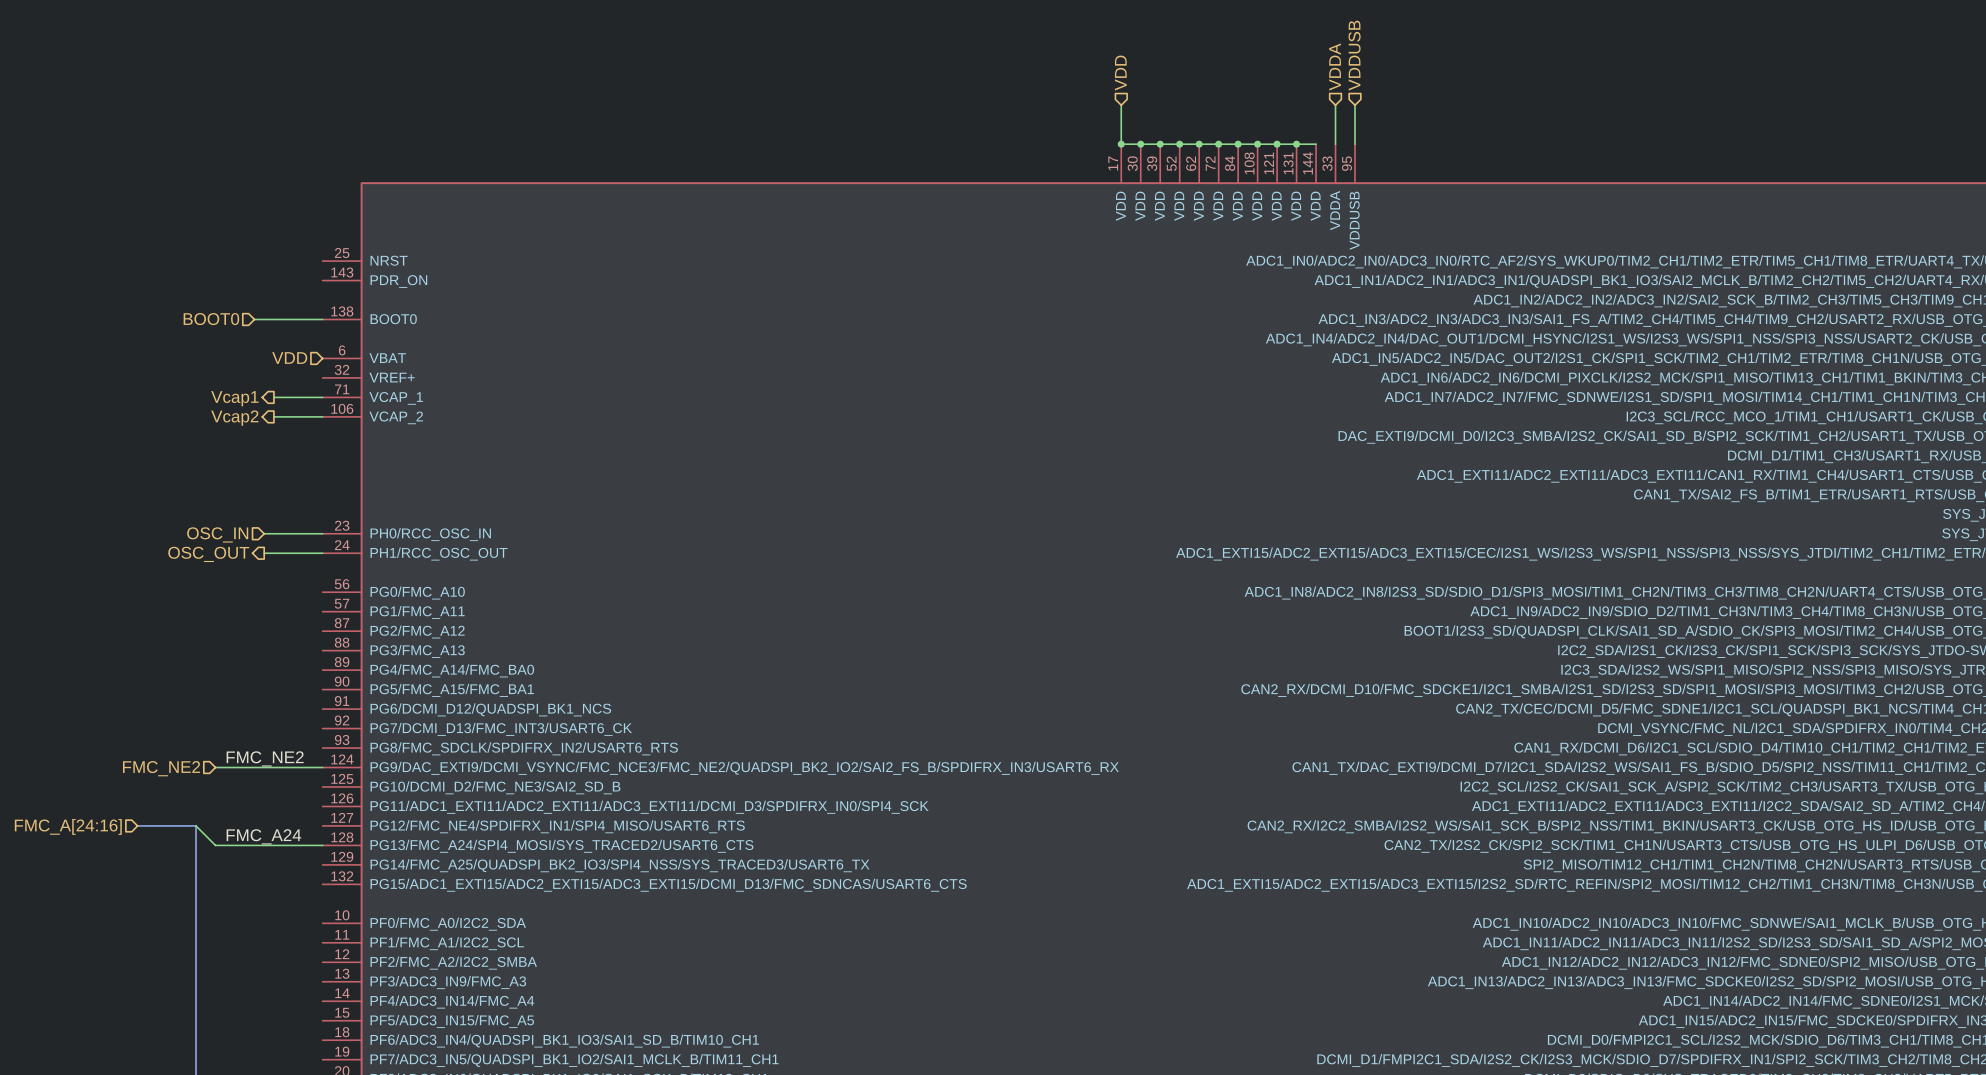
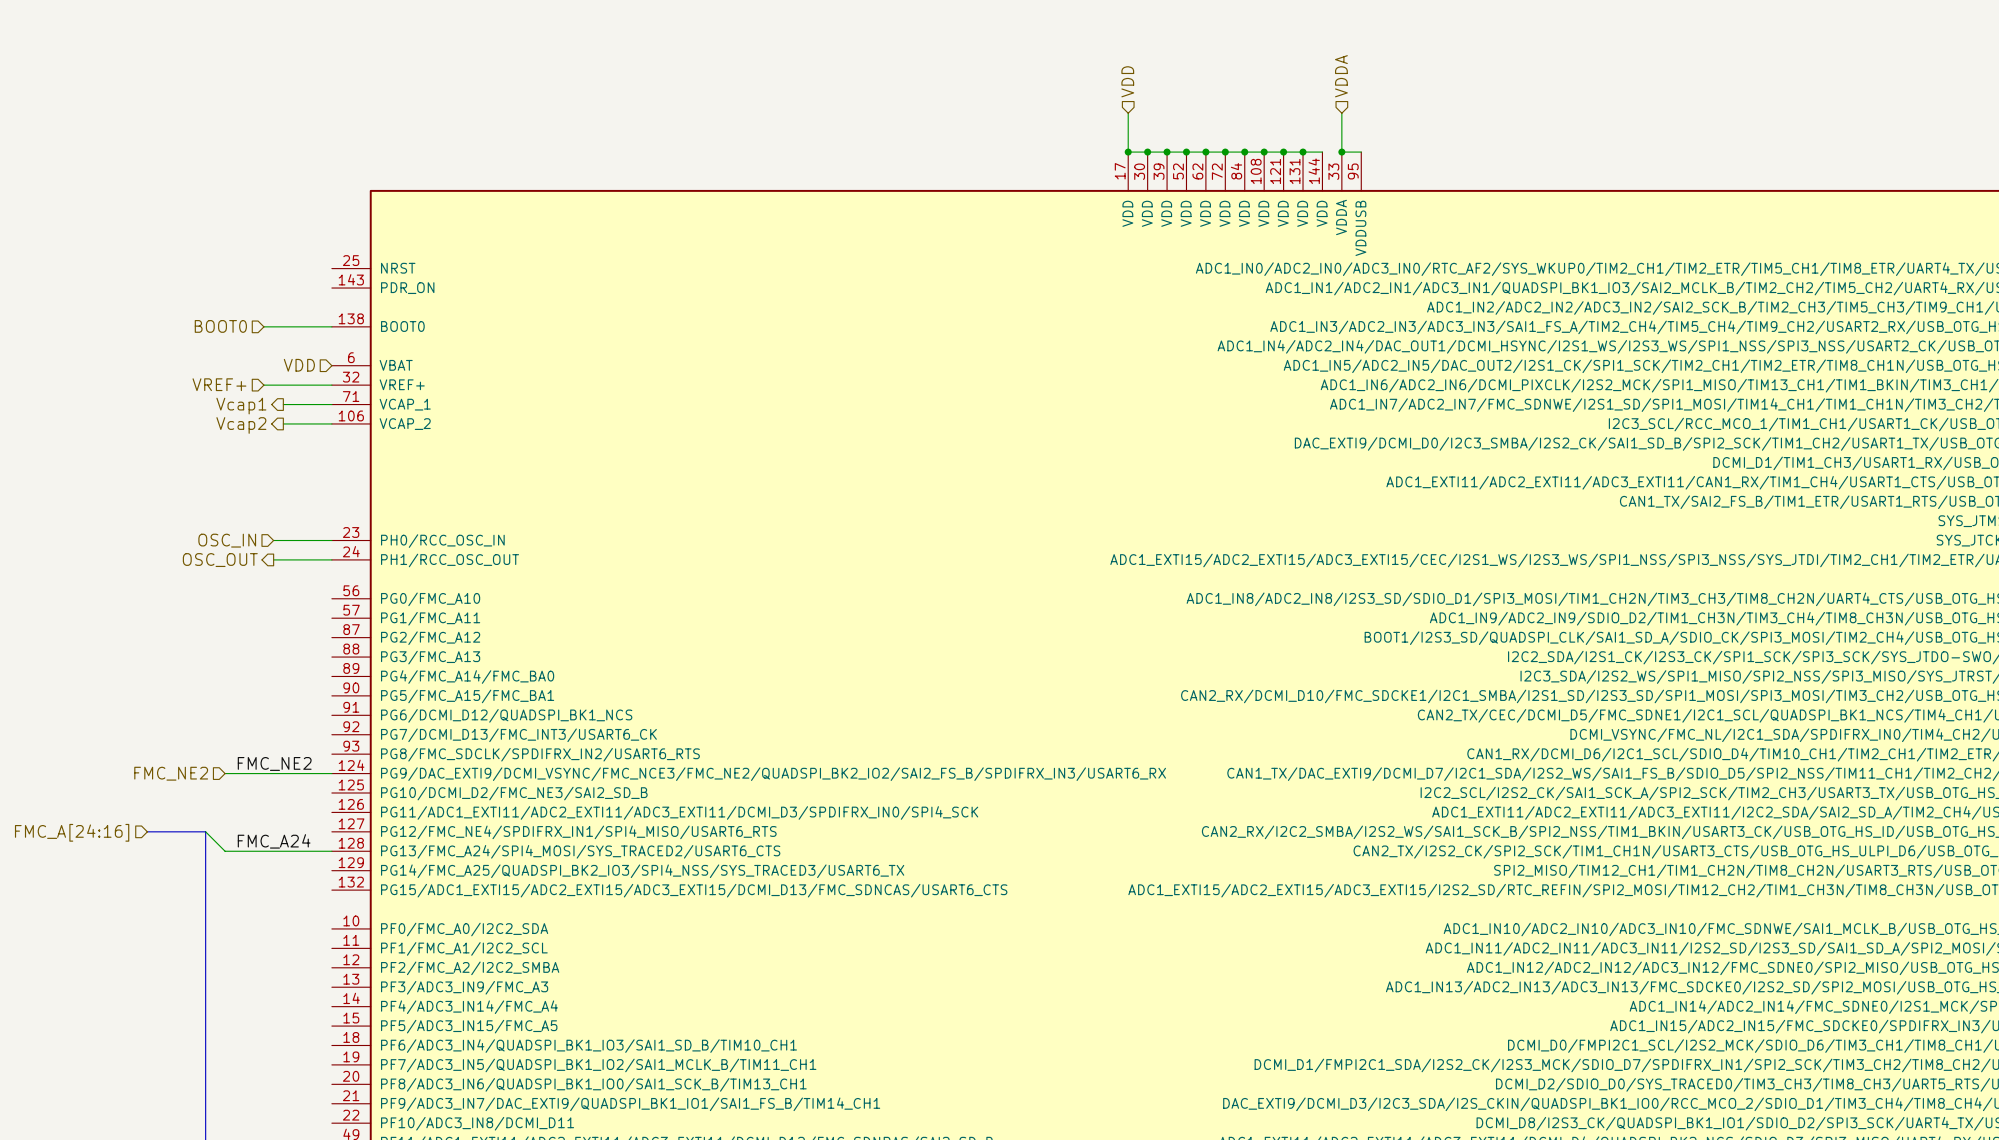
hierarchical label: VDDUSB (1354, 55) -> none
wire: (1355, 105) (1355, 144) -> (1341, 152) (1361, 152)
junction: none -> (1341, 152)
hierarchical label: none -> VREF+ (219, 384)
wire: none -> (263, 385) (331, 385)

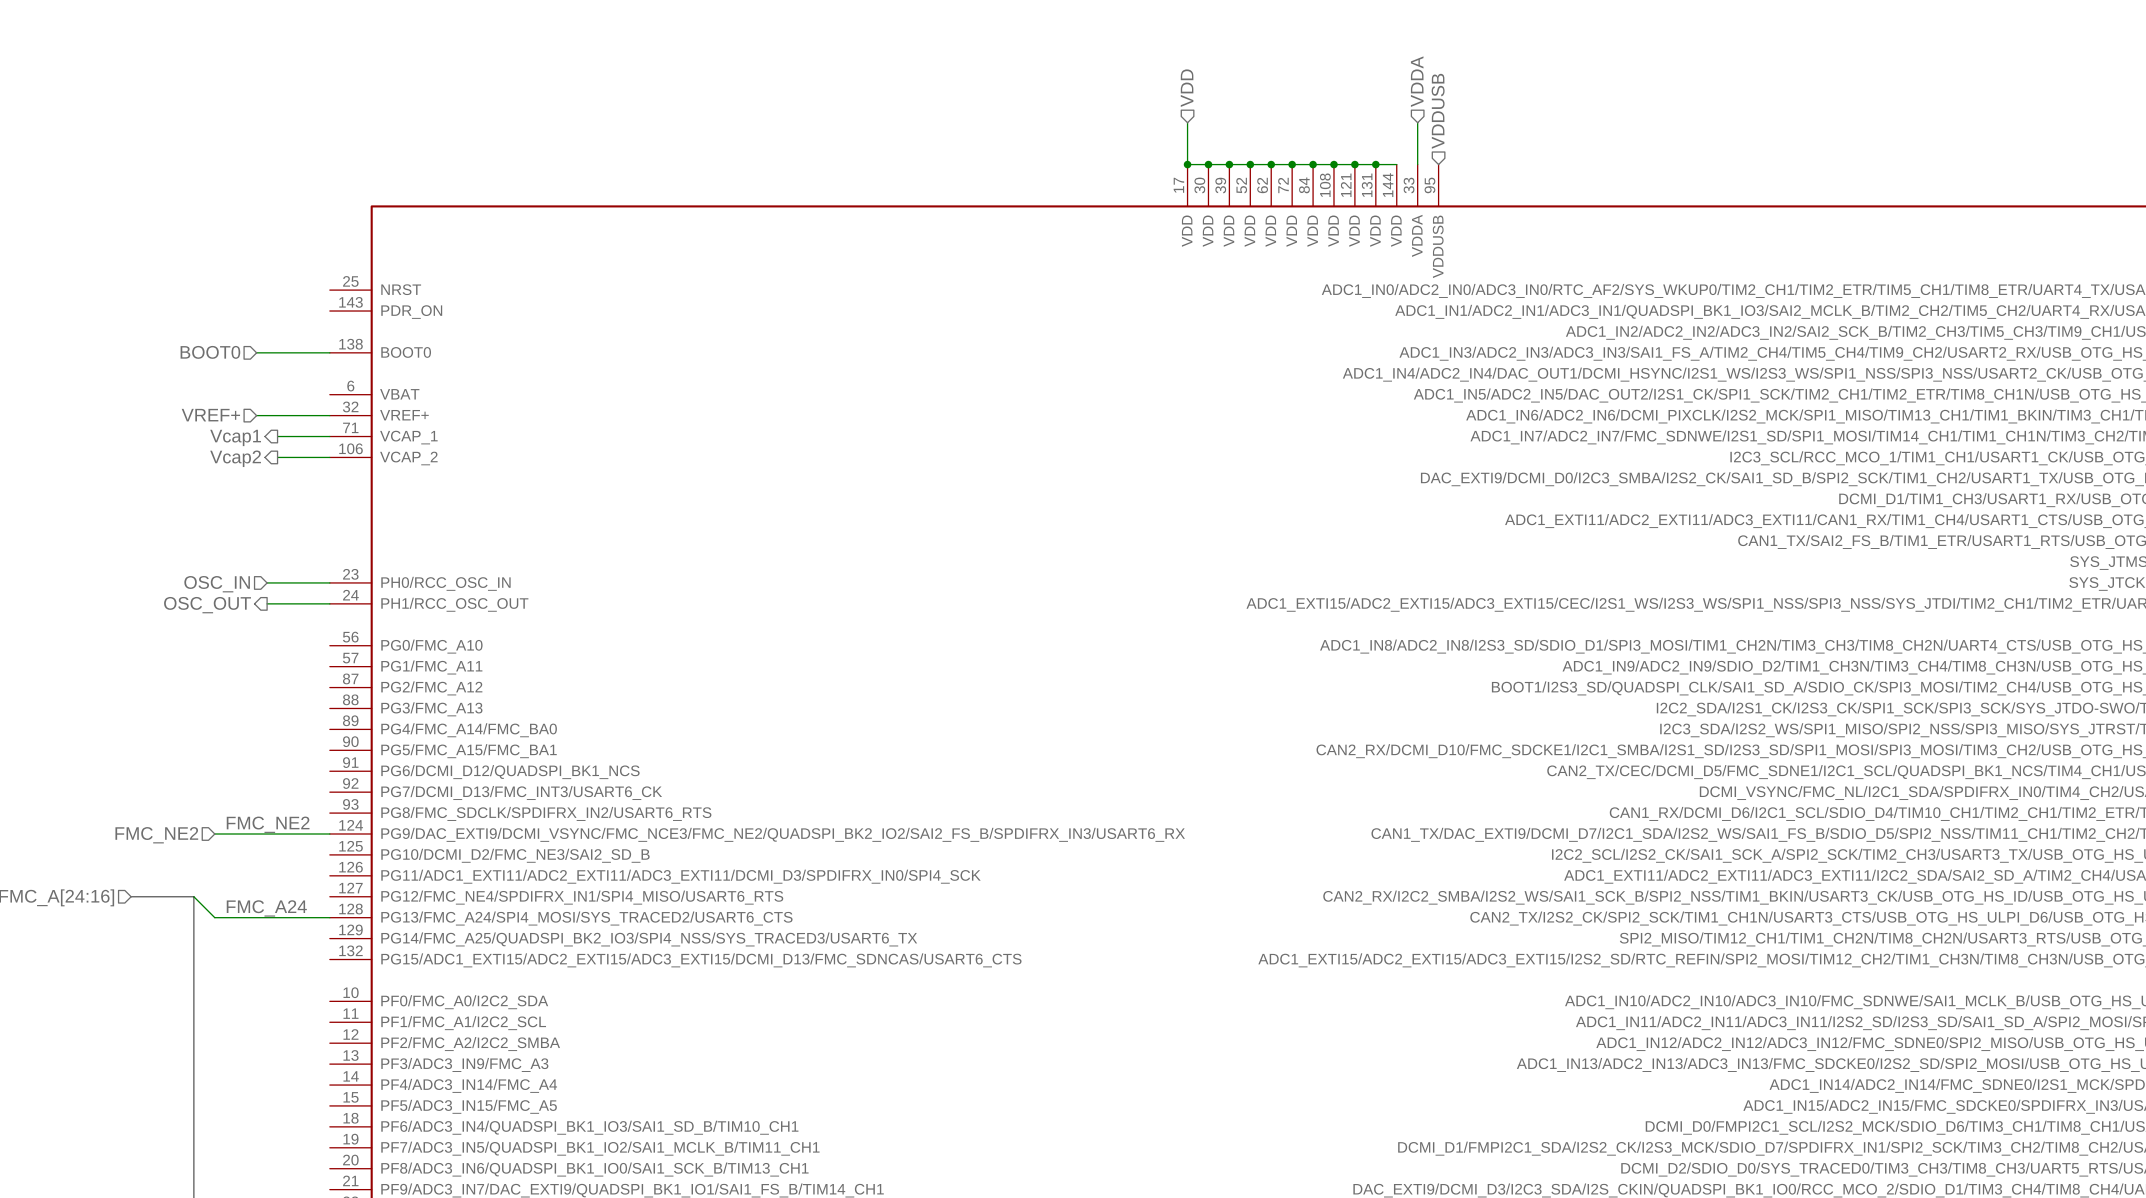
hierarchical label: none -> VDDUSB (1438, 111)
wire: (1341, 152) (1361, 152) -> none
junction: (1341, 152) -> none
hierarchical label: VDD (299, 365) -> none

